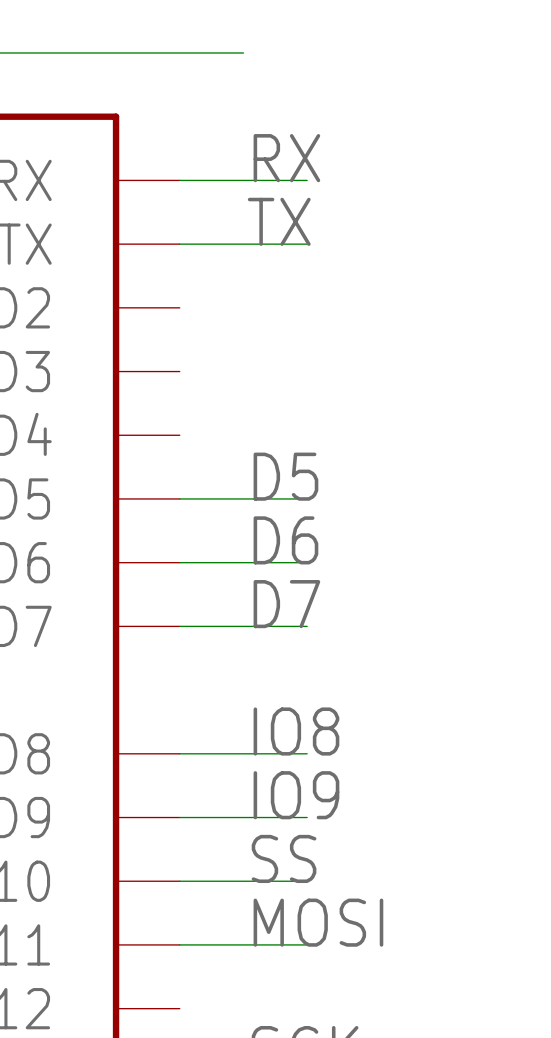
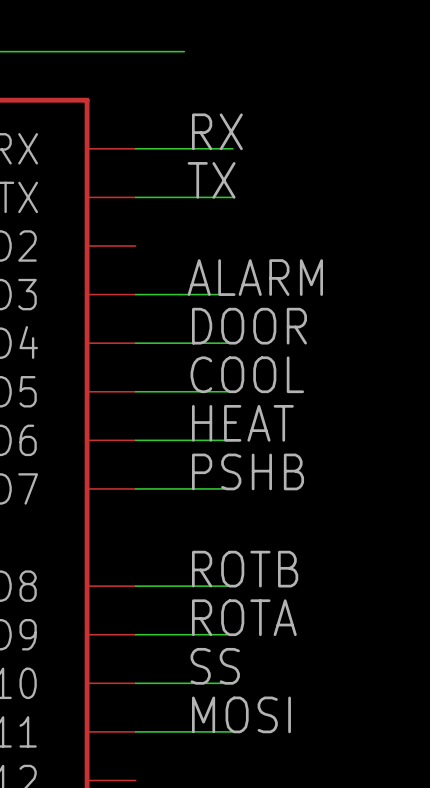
label: none -> ALARM (255, 277)
wire: none -> (135, 294) (232, 294)
label: none -> DOOR (249, 326)
wire: none -> (135, 343) (232, 343)
label: D5 (285, 476) -> COOL (247, 374)
label: D6 (285, 540) -> HEAT (242, 423)
label: D7 (286, 604) -> PSHB (248, 471)
label: IO8 (296, 731) -> ROTB (245, 569)
label: IO9 (296, 795) -> ROTA (244, 617)

